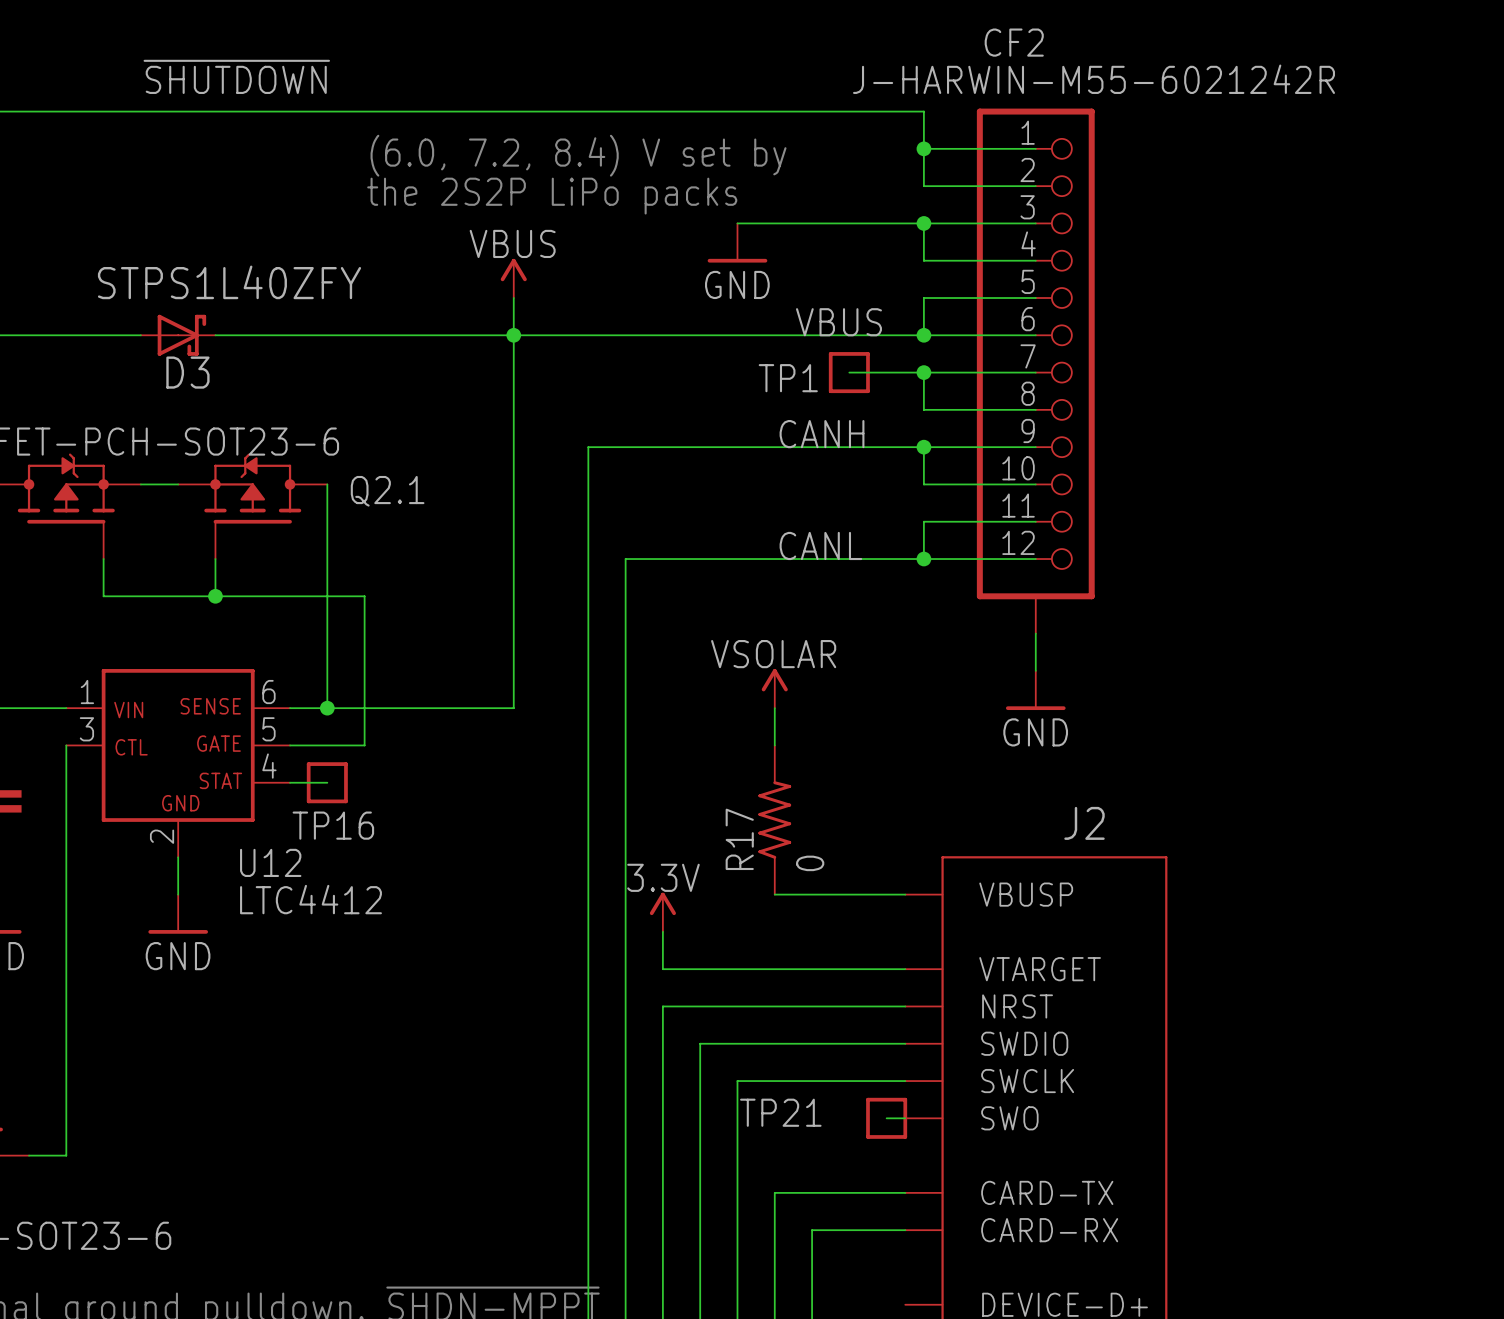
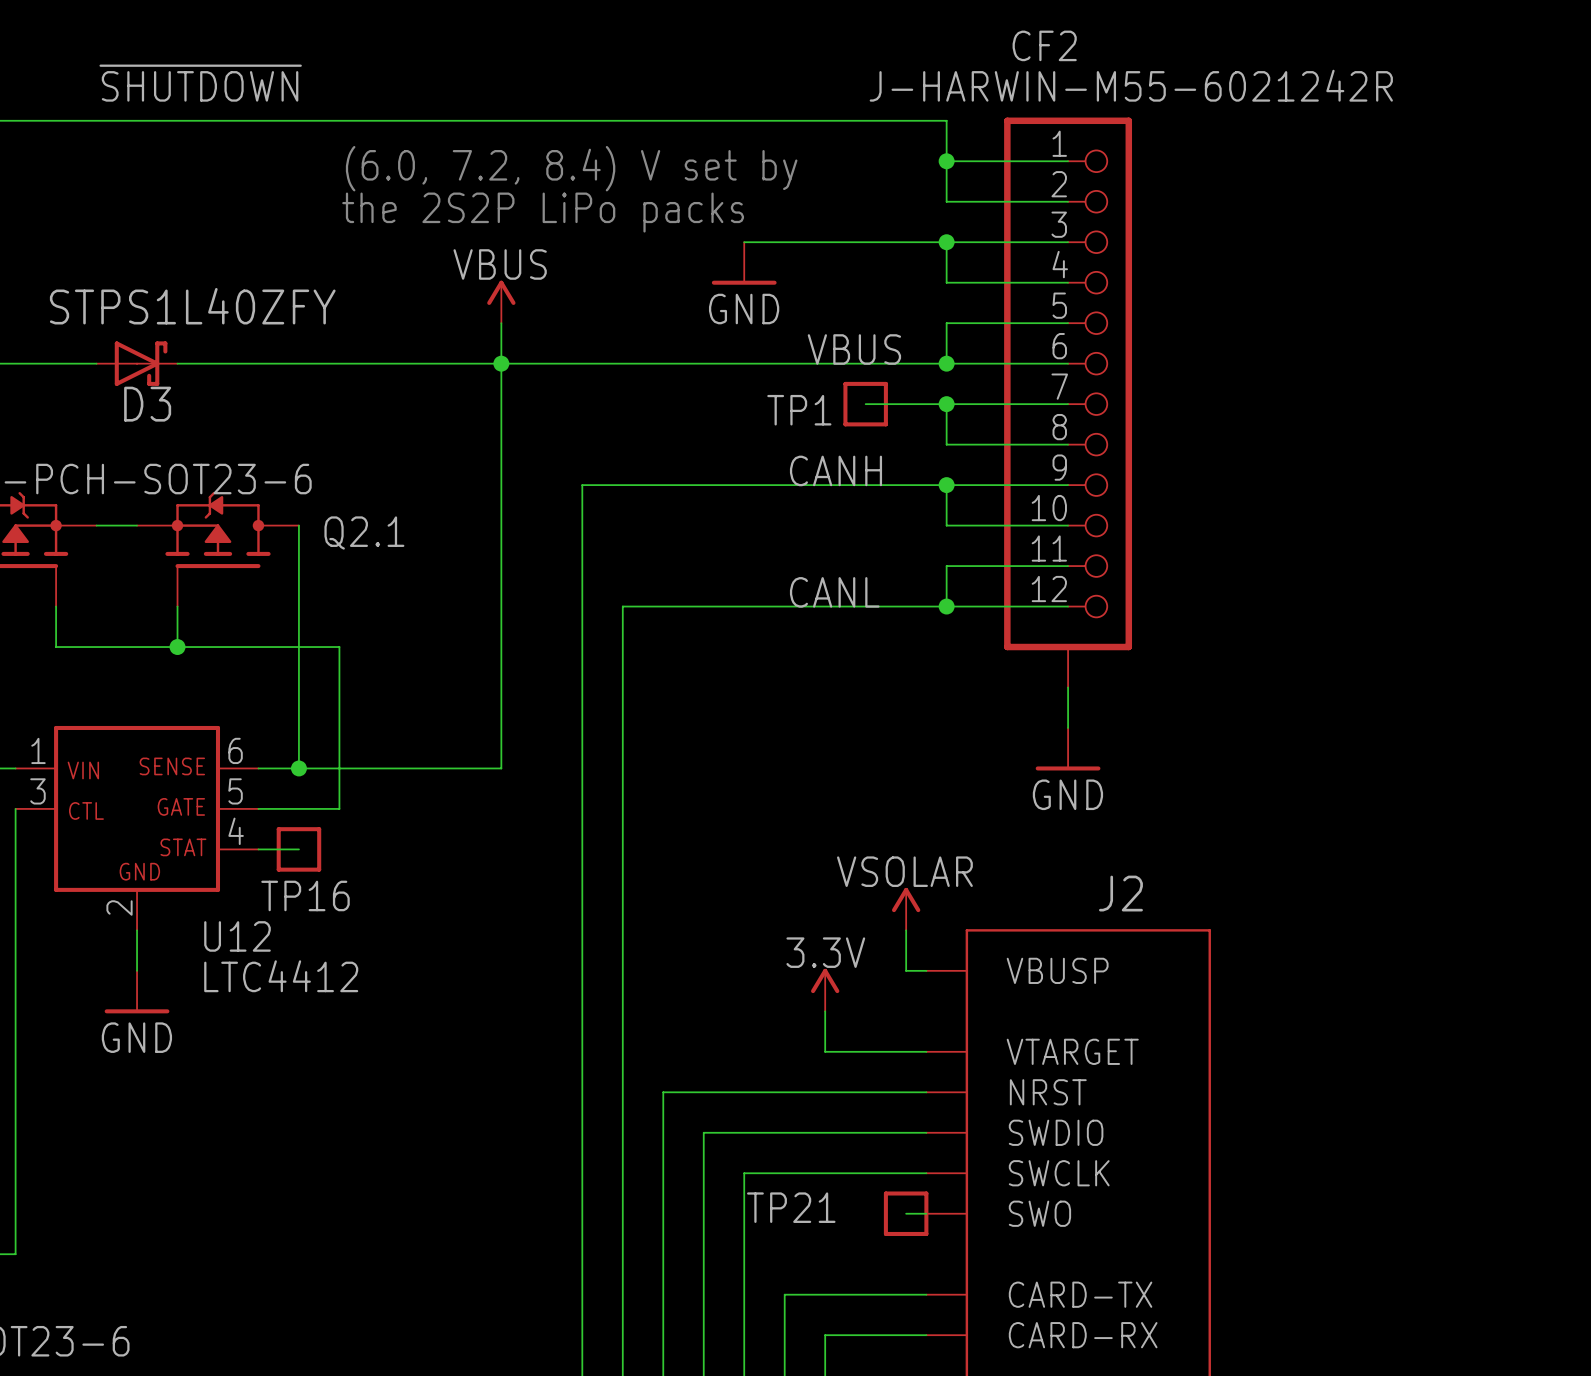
power symbol position: VSOLAR (774, 688) -> VSOLAR (906, 909)
wire: (774, 708) (774, 745) -> none
R17: 0 (774, 820) -> none
wire: (774, 894) (886, 894) -> (906, 930) (906, 970)
power symbol position: 3.3V (662, 912) -> 3.3V (825, 990)
wire: (662, 931) (662, 969) (812, 969) -> (825, 1011) (825, 1051)

